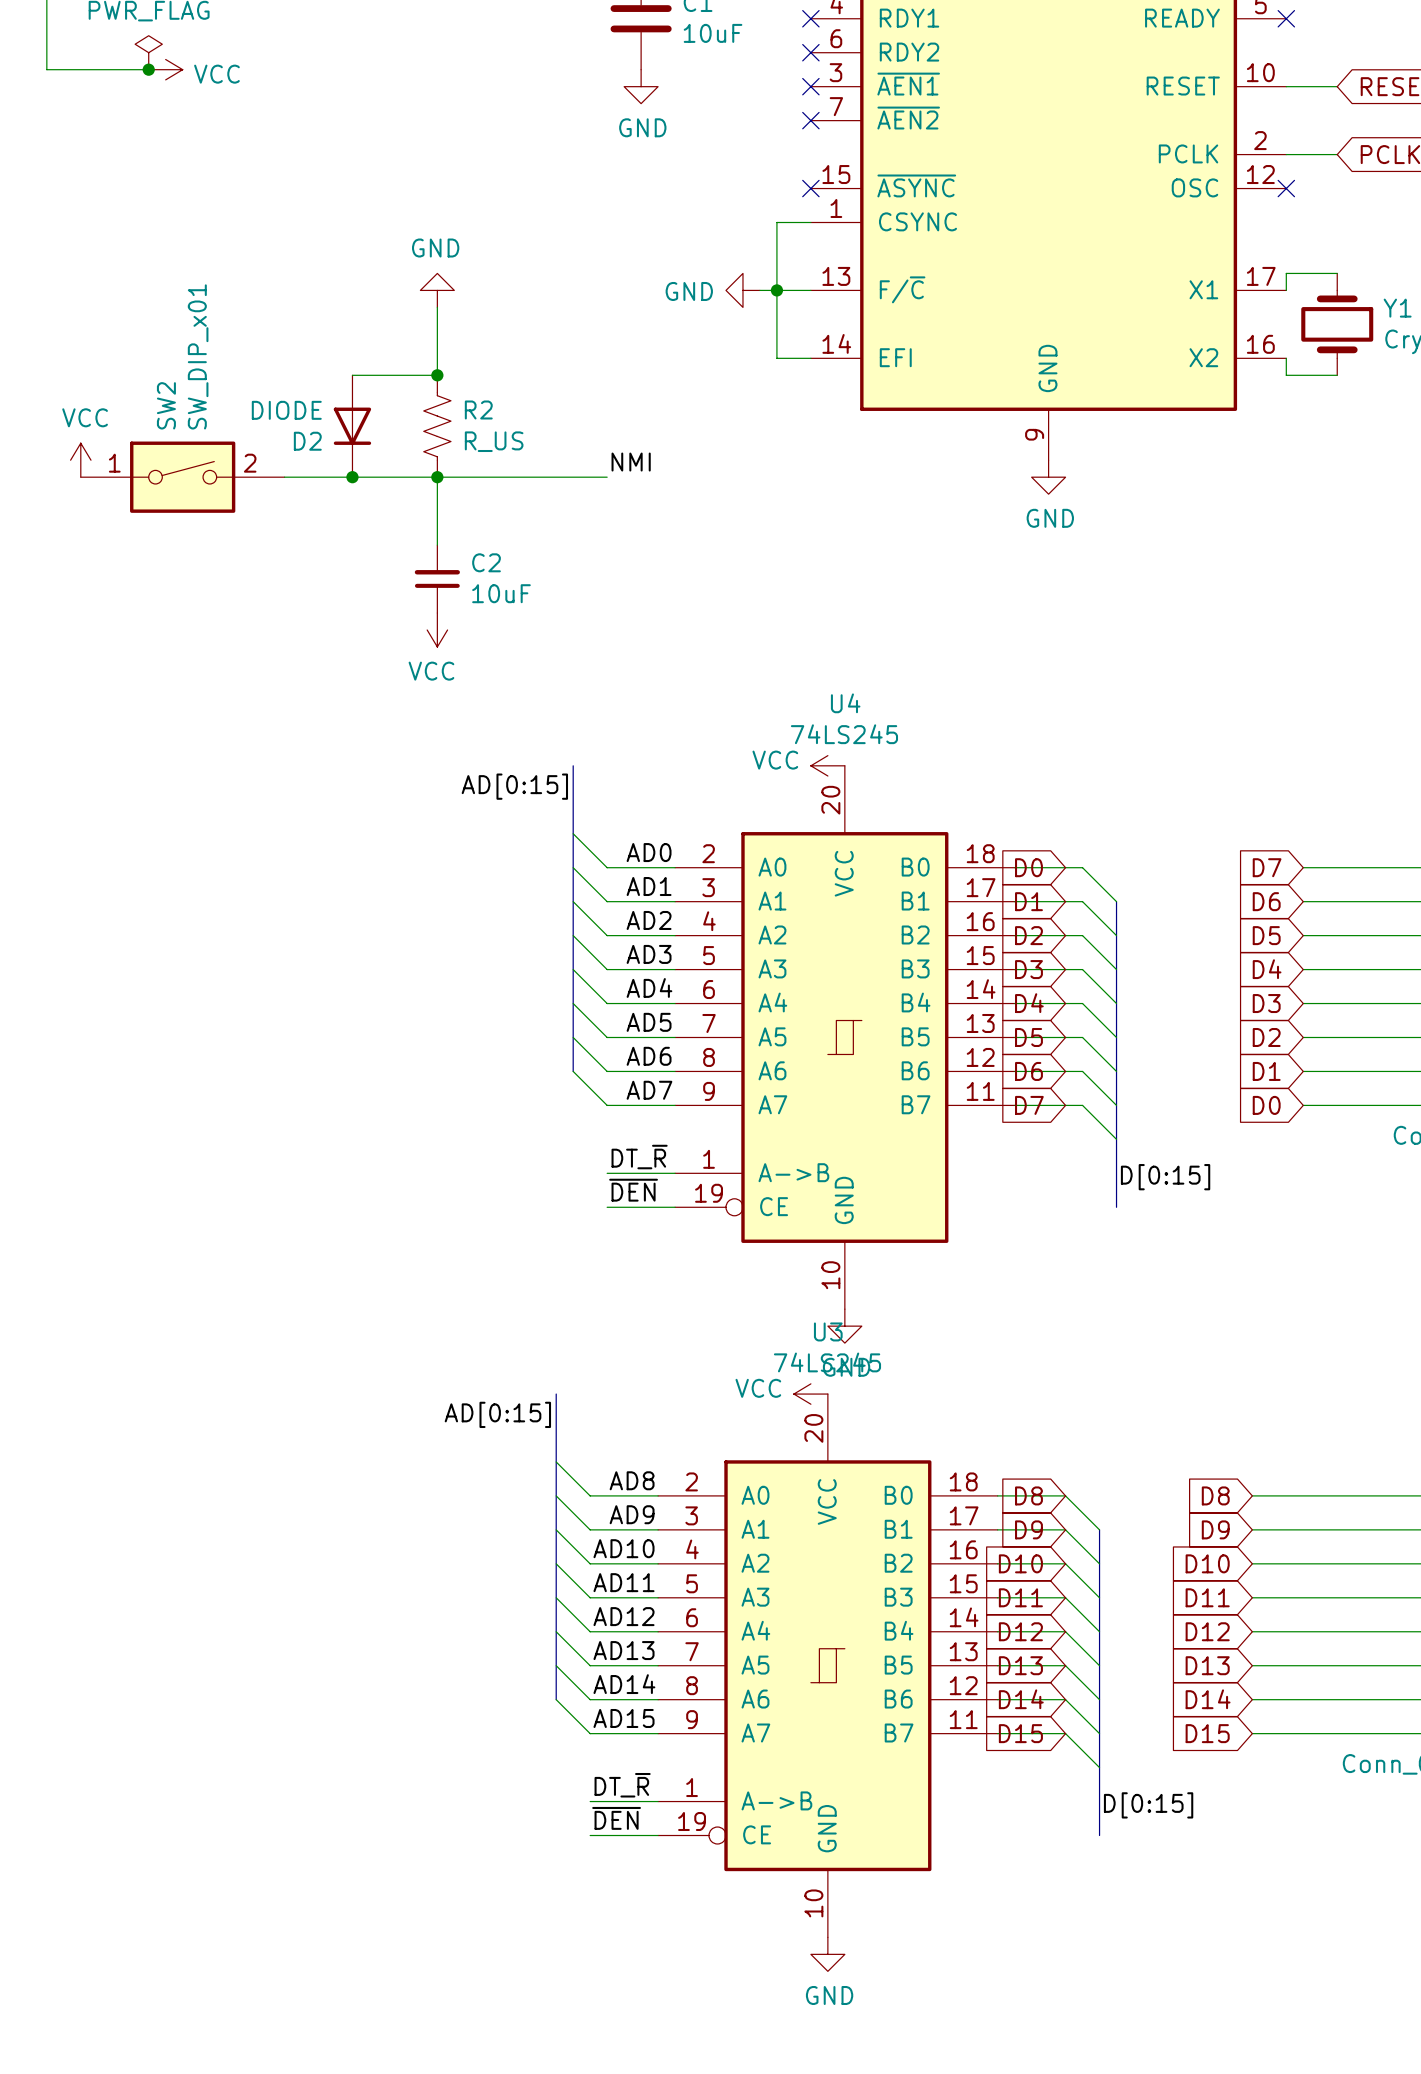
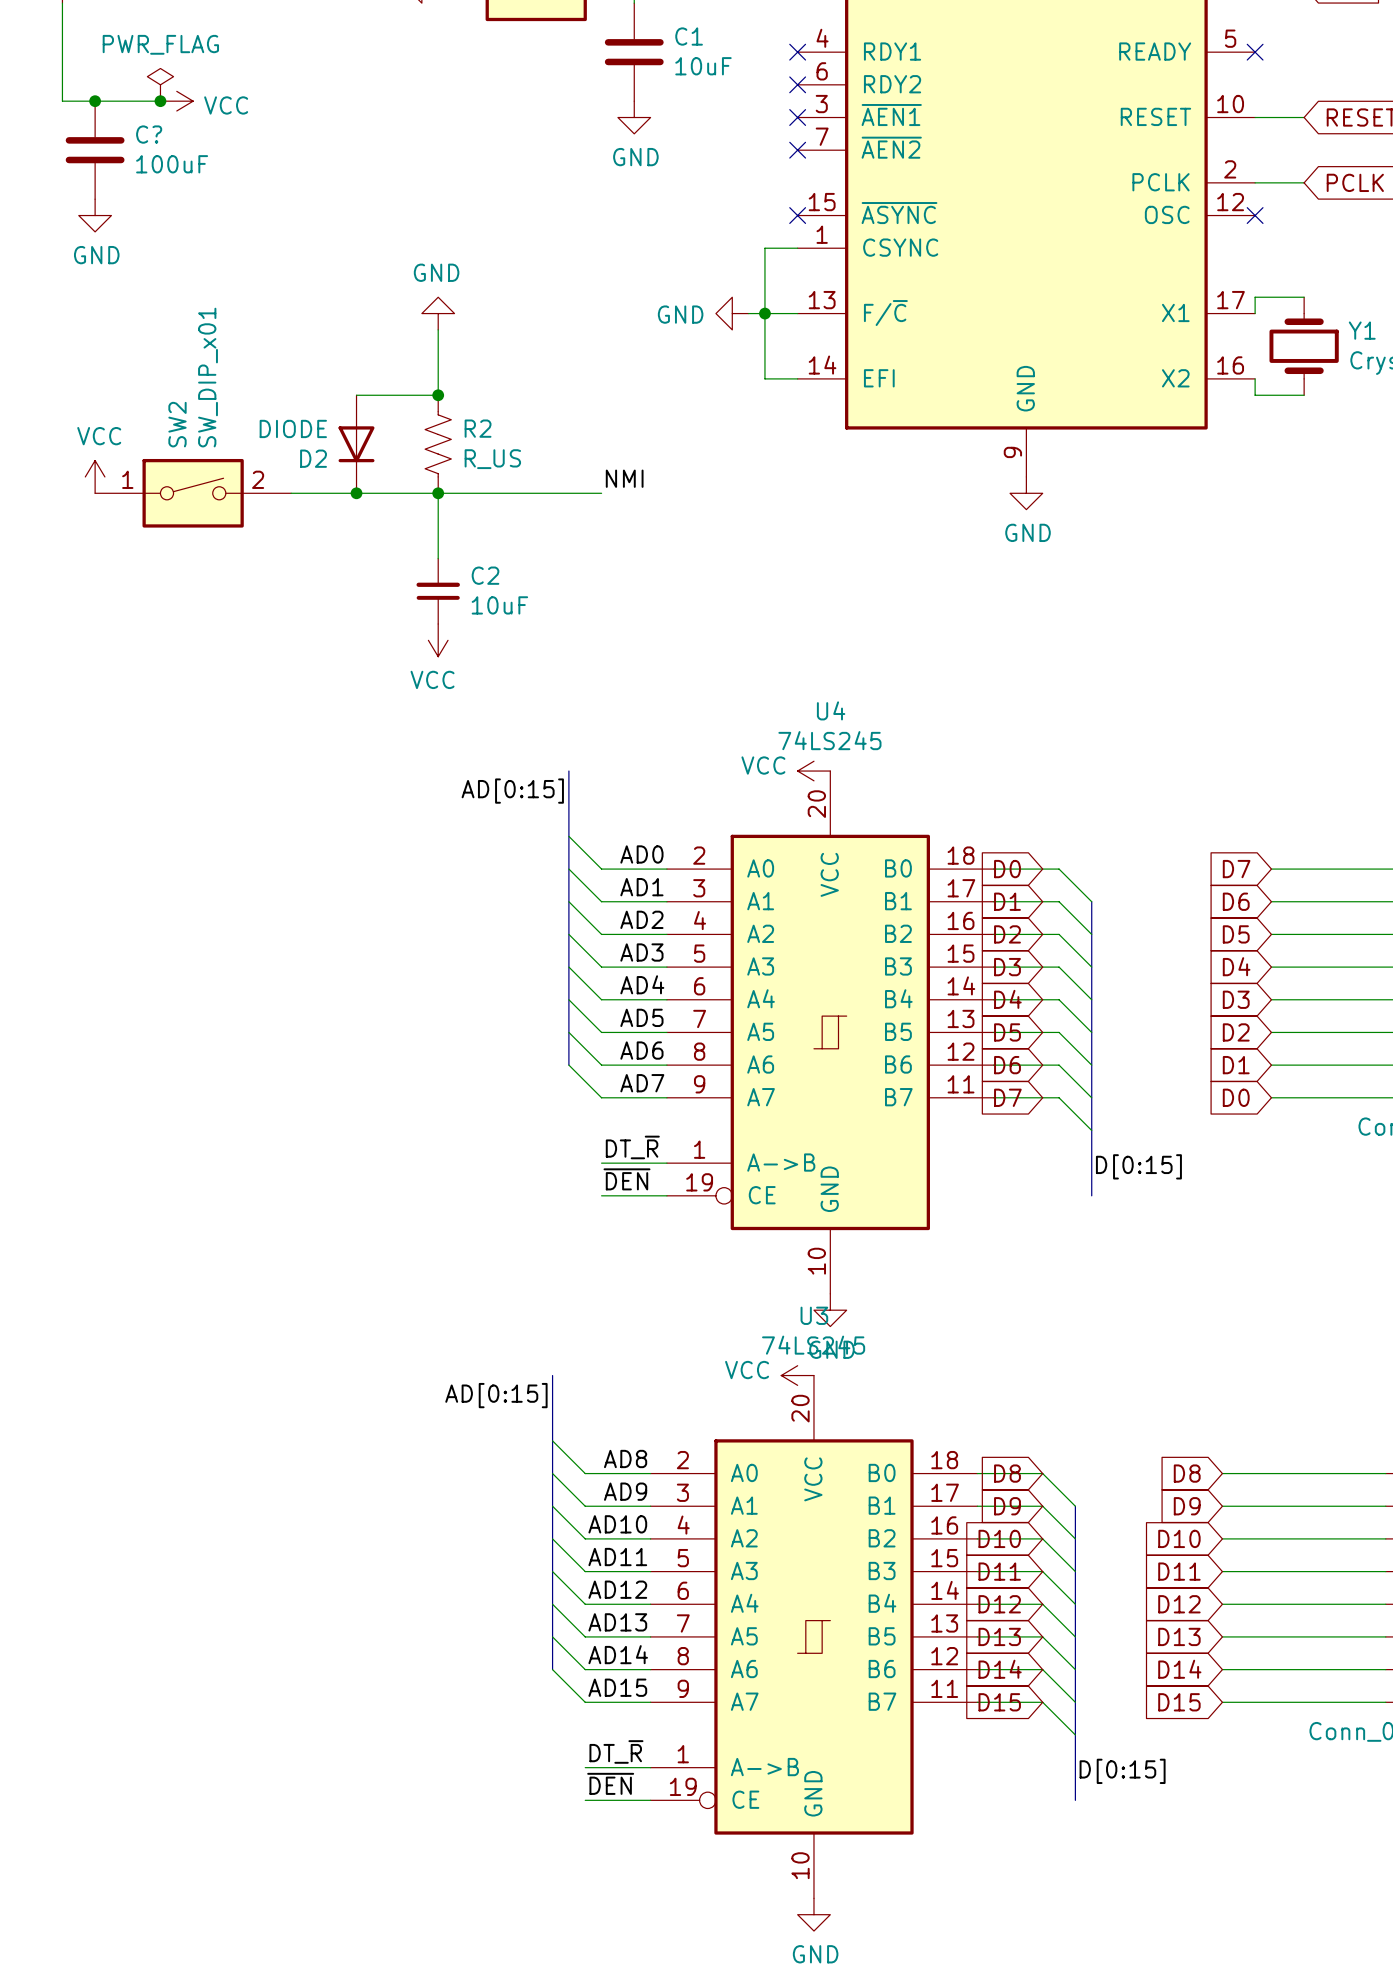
junction: none -> (95, 101)
C?: none -> 100uF (95, 150)
power symbol: none -> GND (95, 215)

